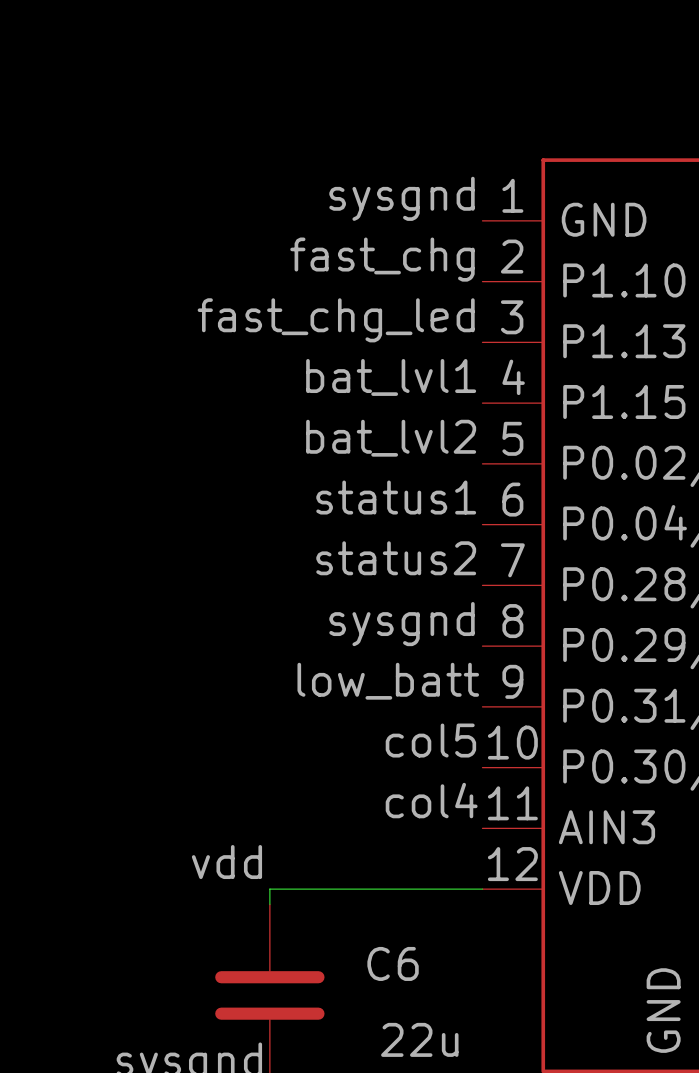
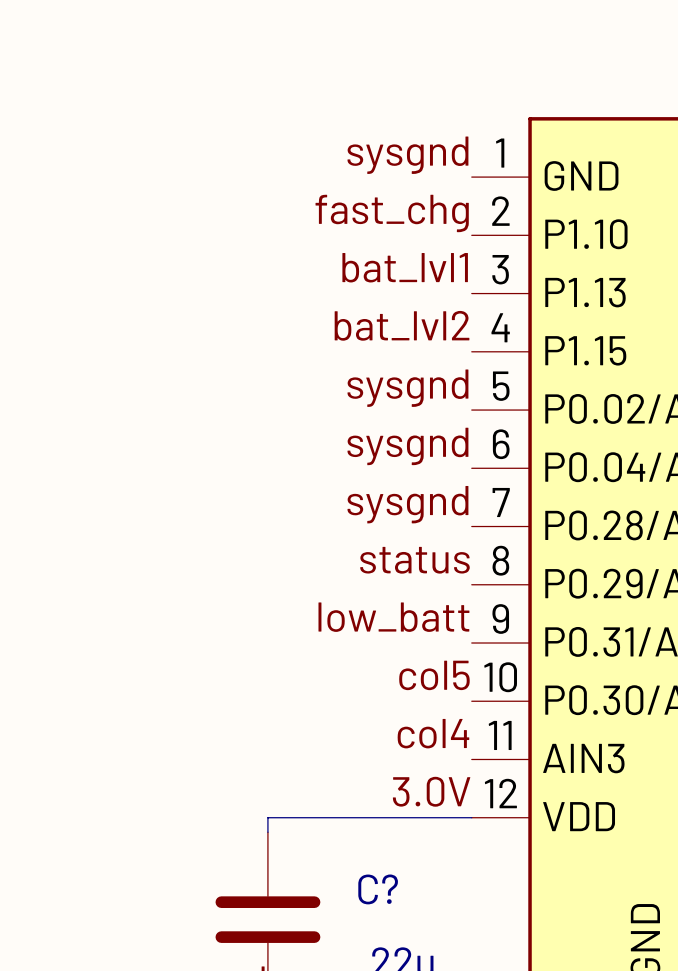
label: fast_chg_led (336, 320) -> bat_lvl1 (405, 267)
label: bat_lvl1 (391, 377) -> bat_lvl2 (402, 325)
label: bat_lvl2 (391, 438) -> sysgnd (407, 388)
label: status1 (396, 497) -> sysgnd (407, 446)
label: status2 (396, 558) -> sysgnd (407, 504)
label: sysgnd (401, 624) -> status (415, 560)
label: vdd (226, 862) -> none
label: none -> 3.0V (431, 791)
C6 name: C6 (393, 963) -> C? (378, 889)

